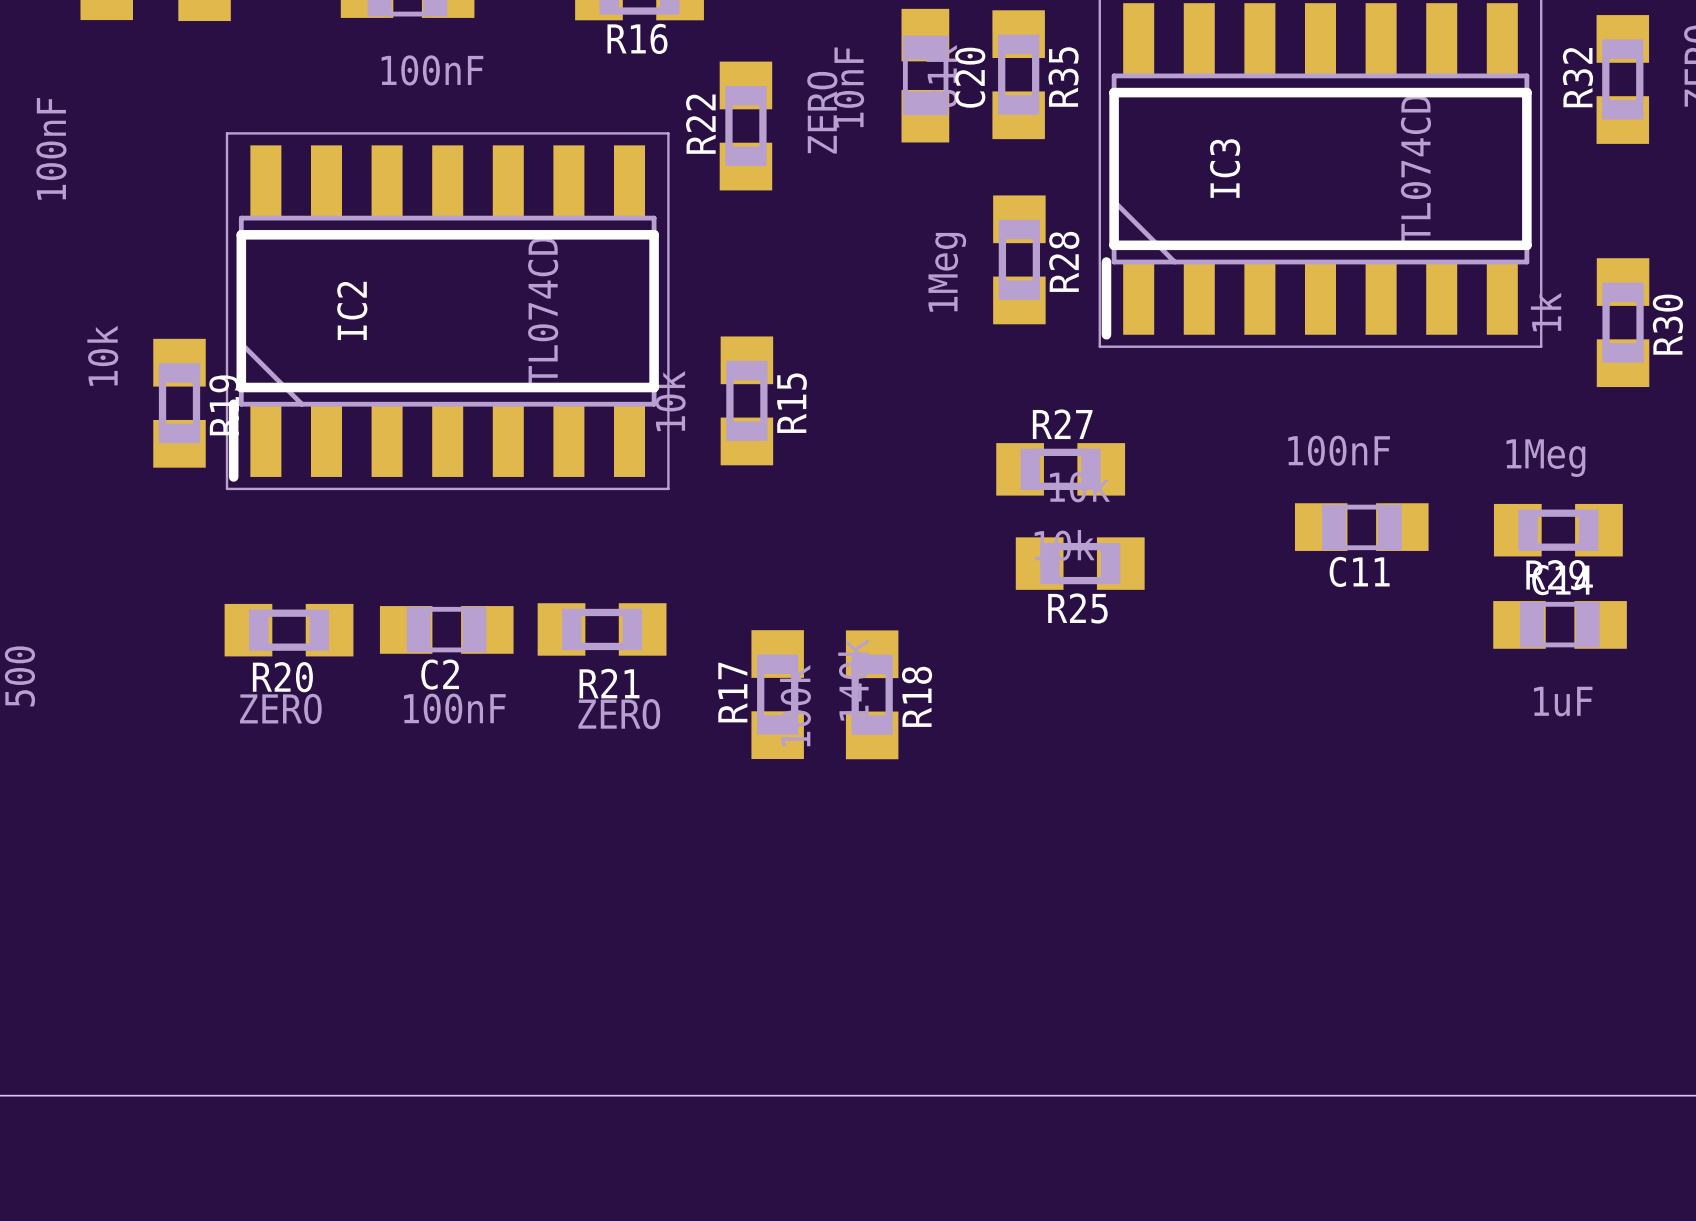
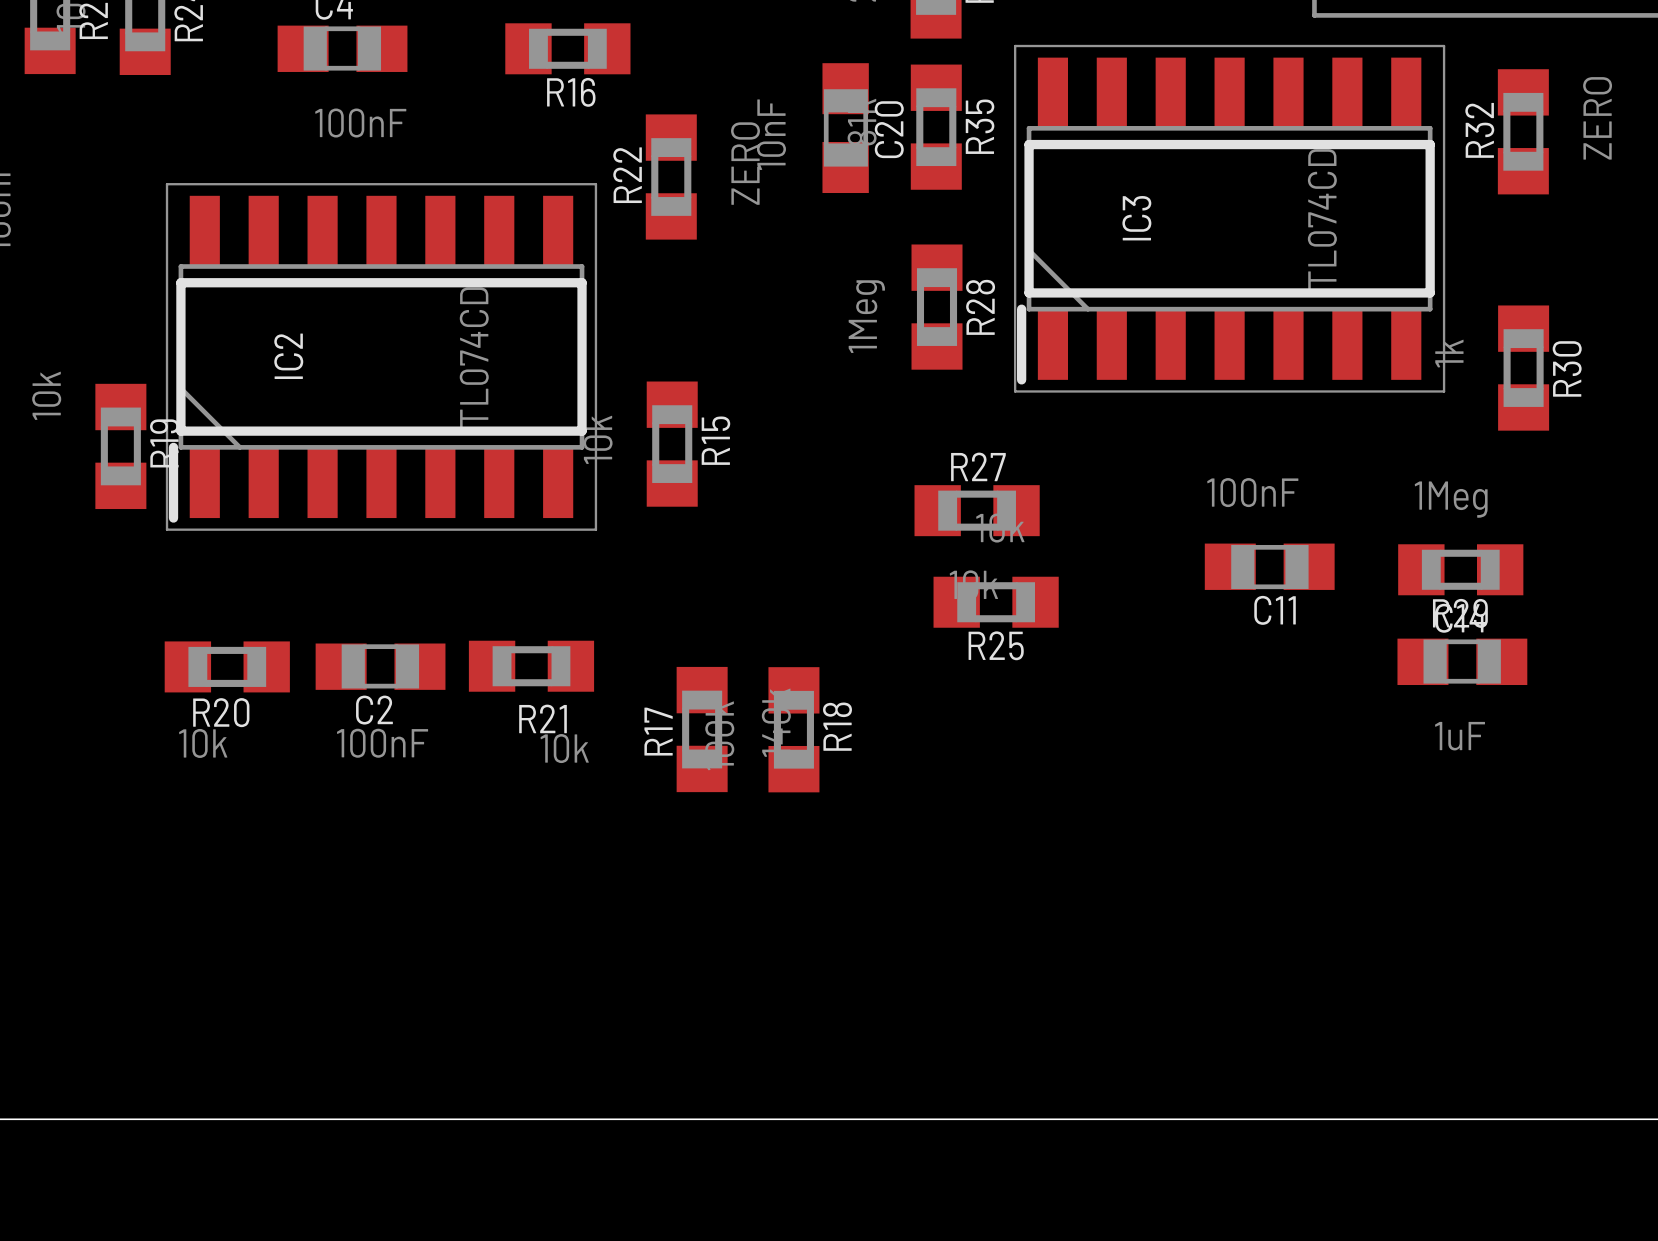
R20 value: ZERO (280, 708) -> 10k (203, 743)
R21 value: ZERO (619, 714) -> 10k (564, 748)

